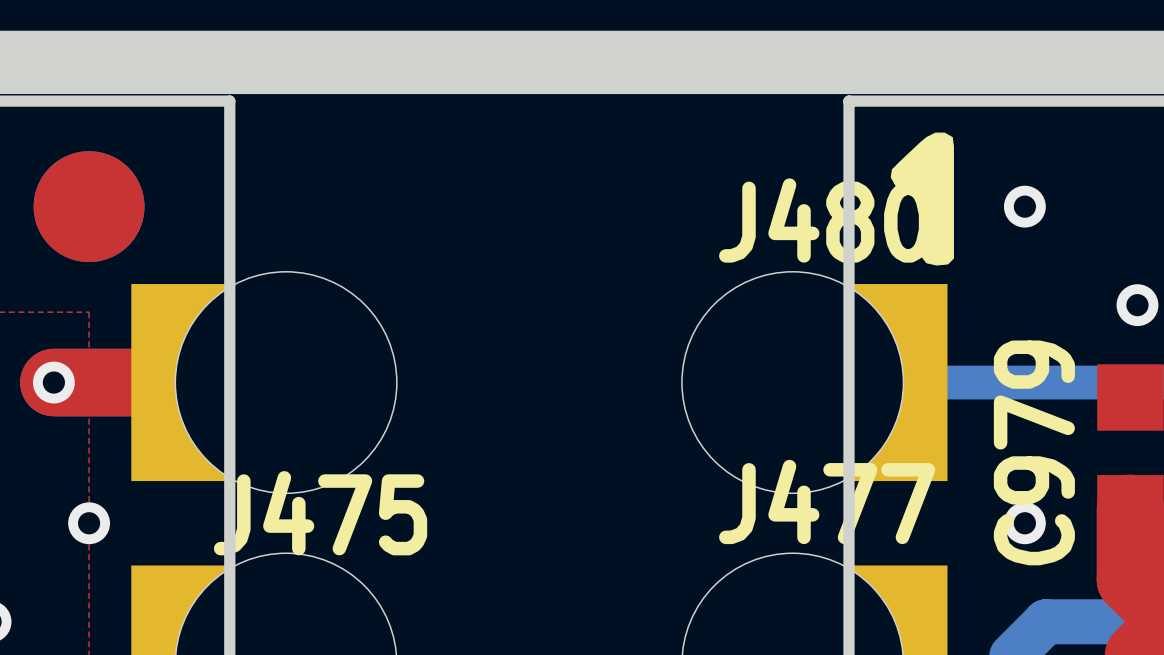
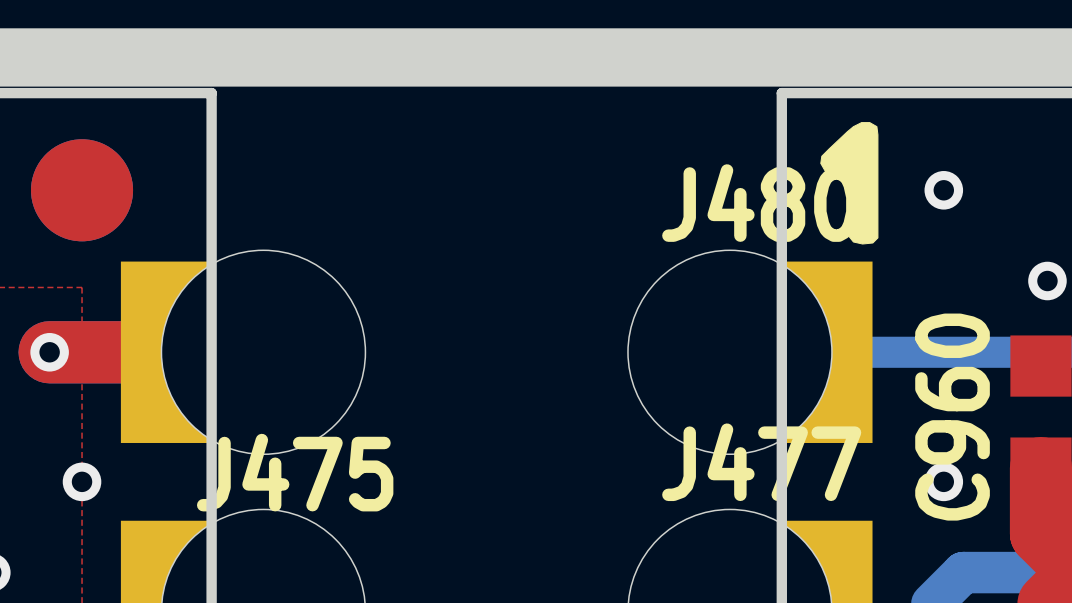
C979 name: C979 (1034, 452) -> C960 (952, 417)

